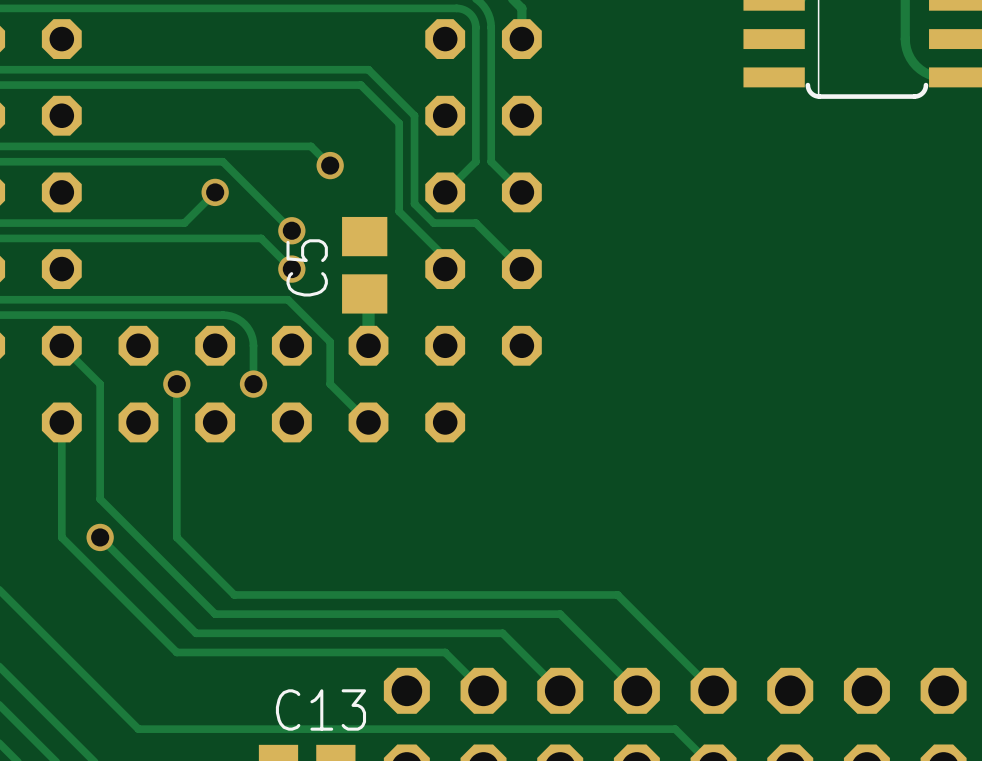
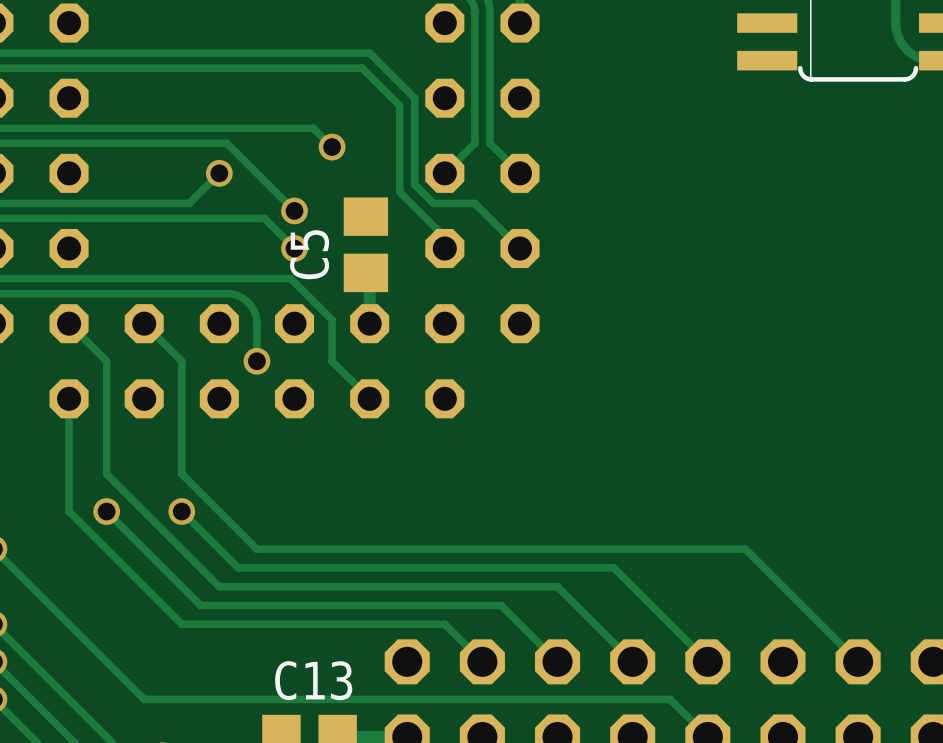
track: none -> (144, 323) (181, 361)
via position: (176, 384) -> (181, 511)
track: (176, 499) (176, 537) -> (181, 473) (256, 549) (745, 549) (858, 661)

